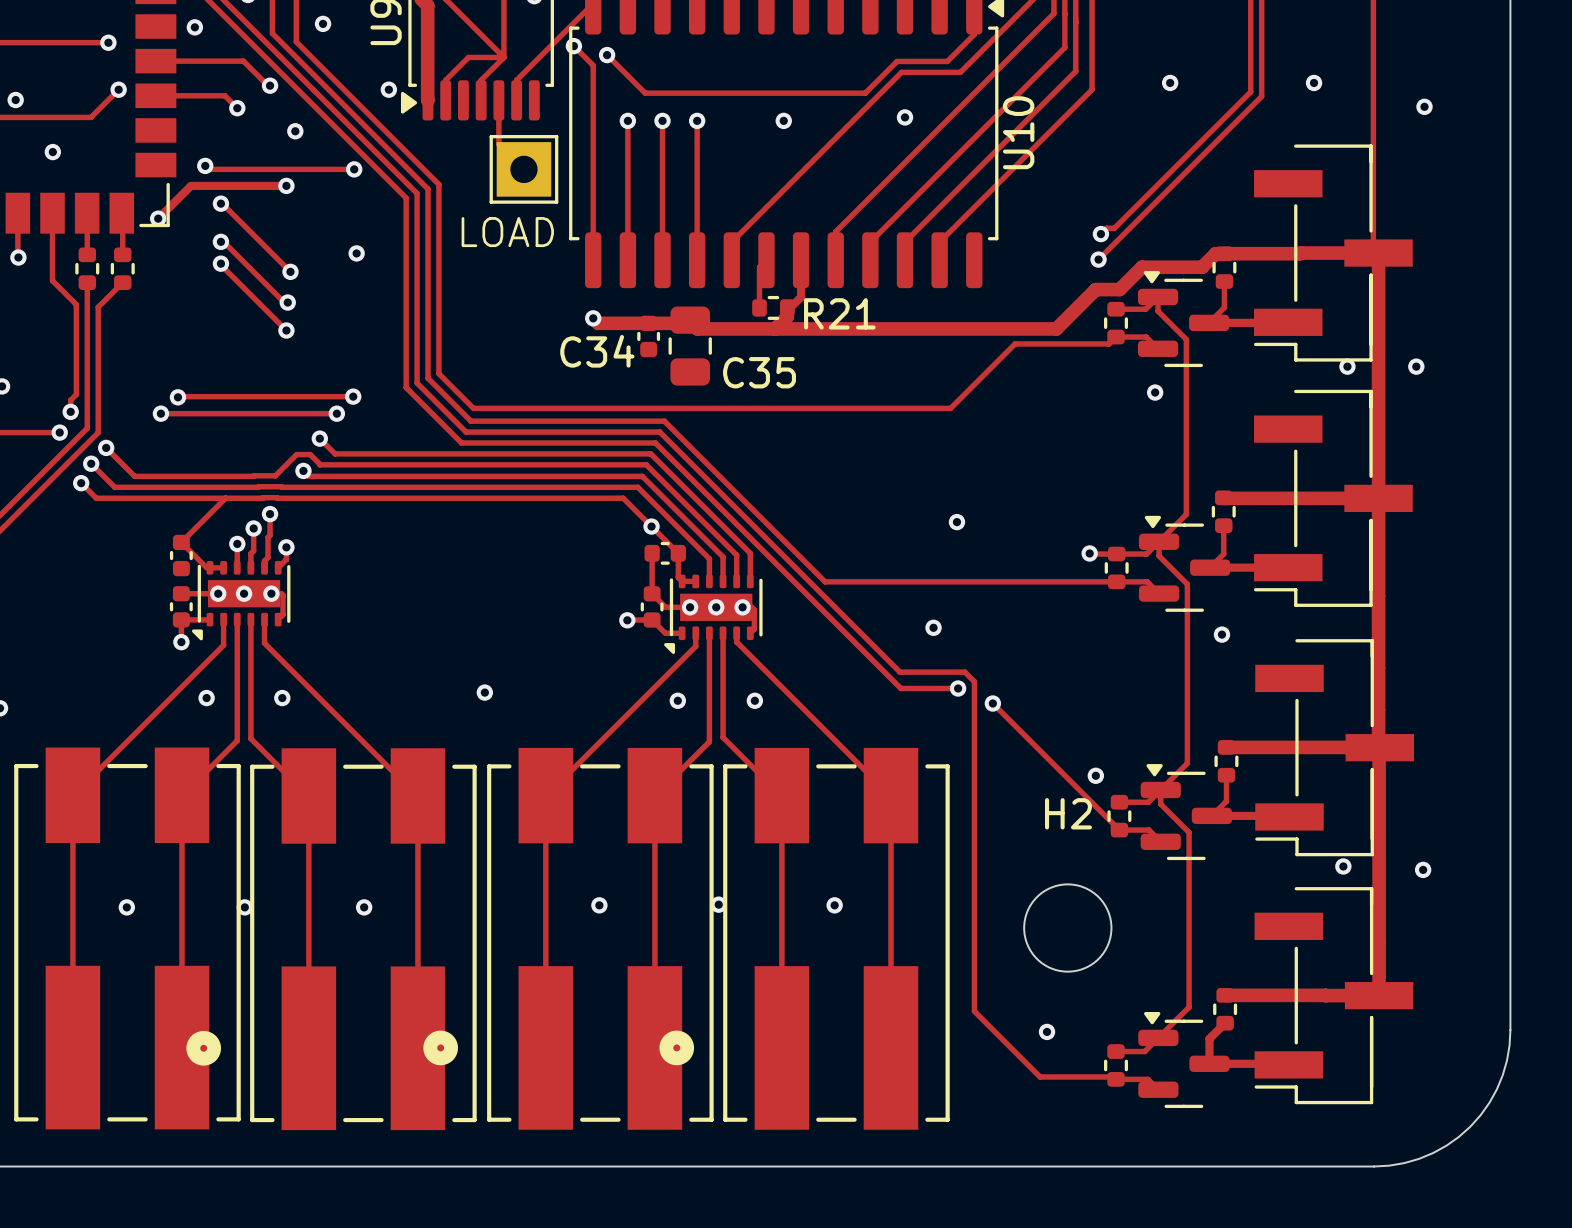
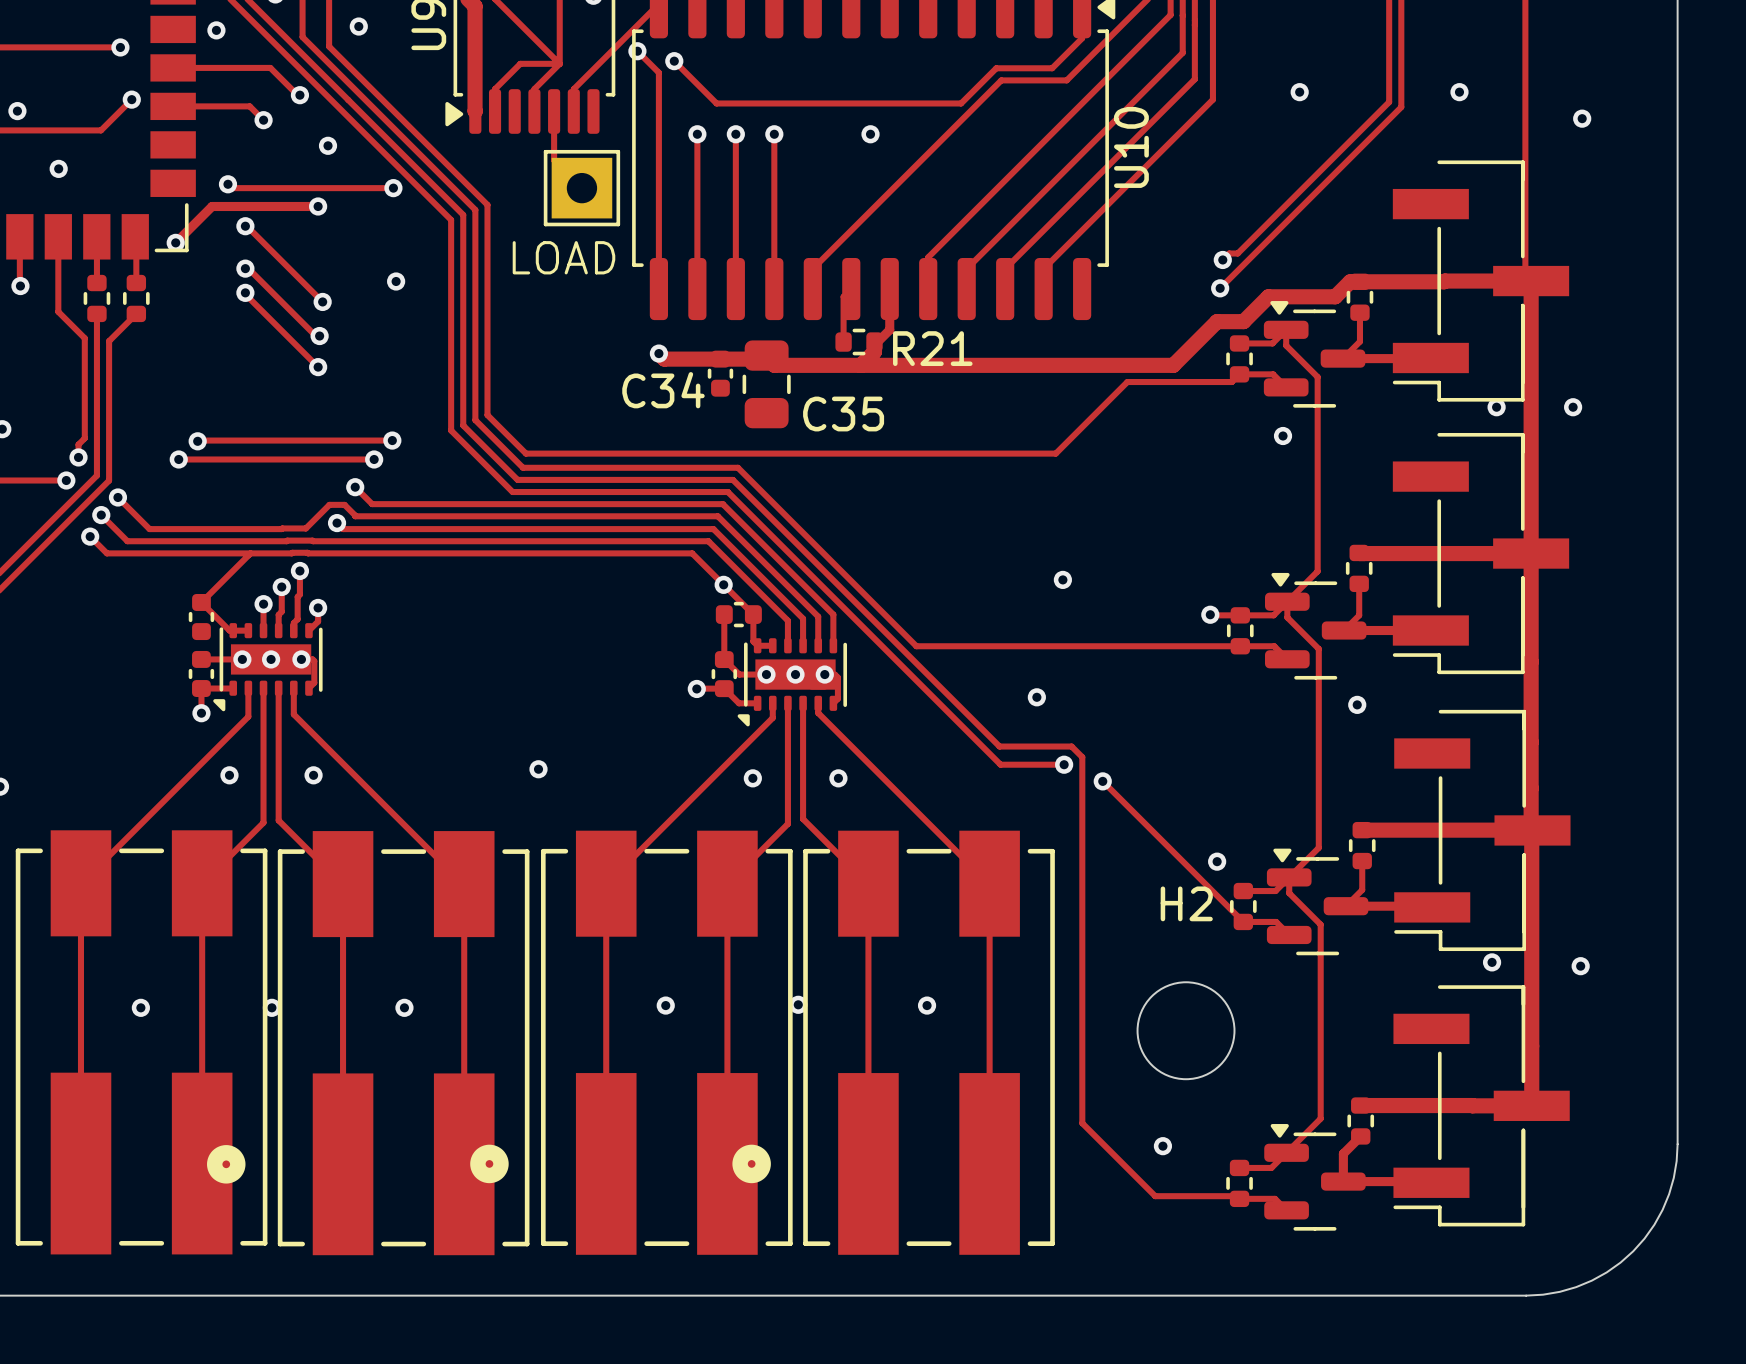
via: (388, 89) -> none
via: (905, 117) -> none

